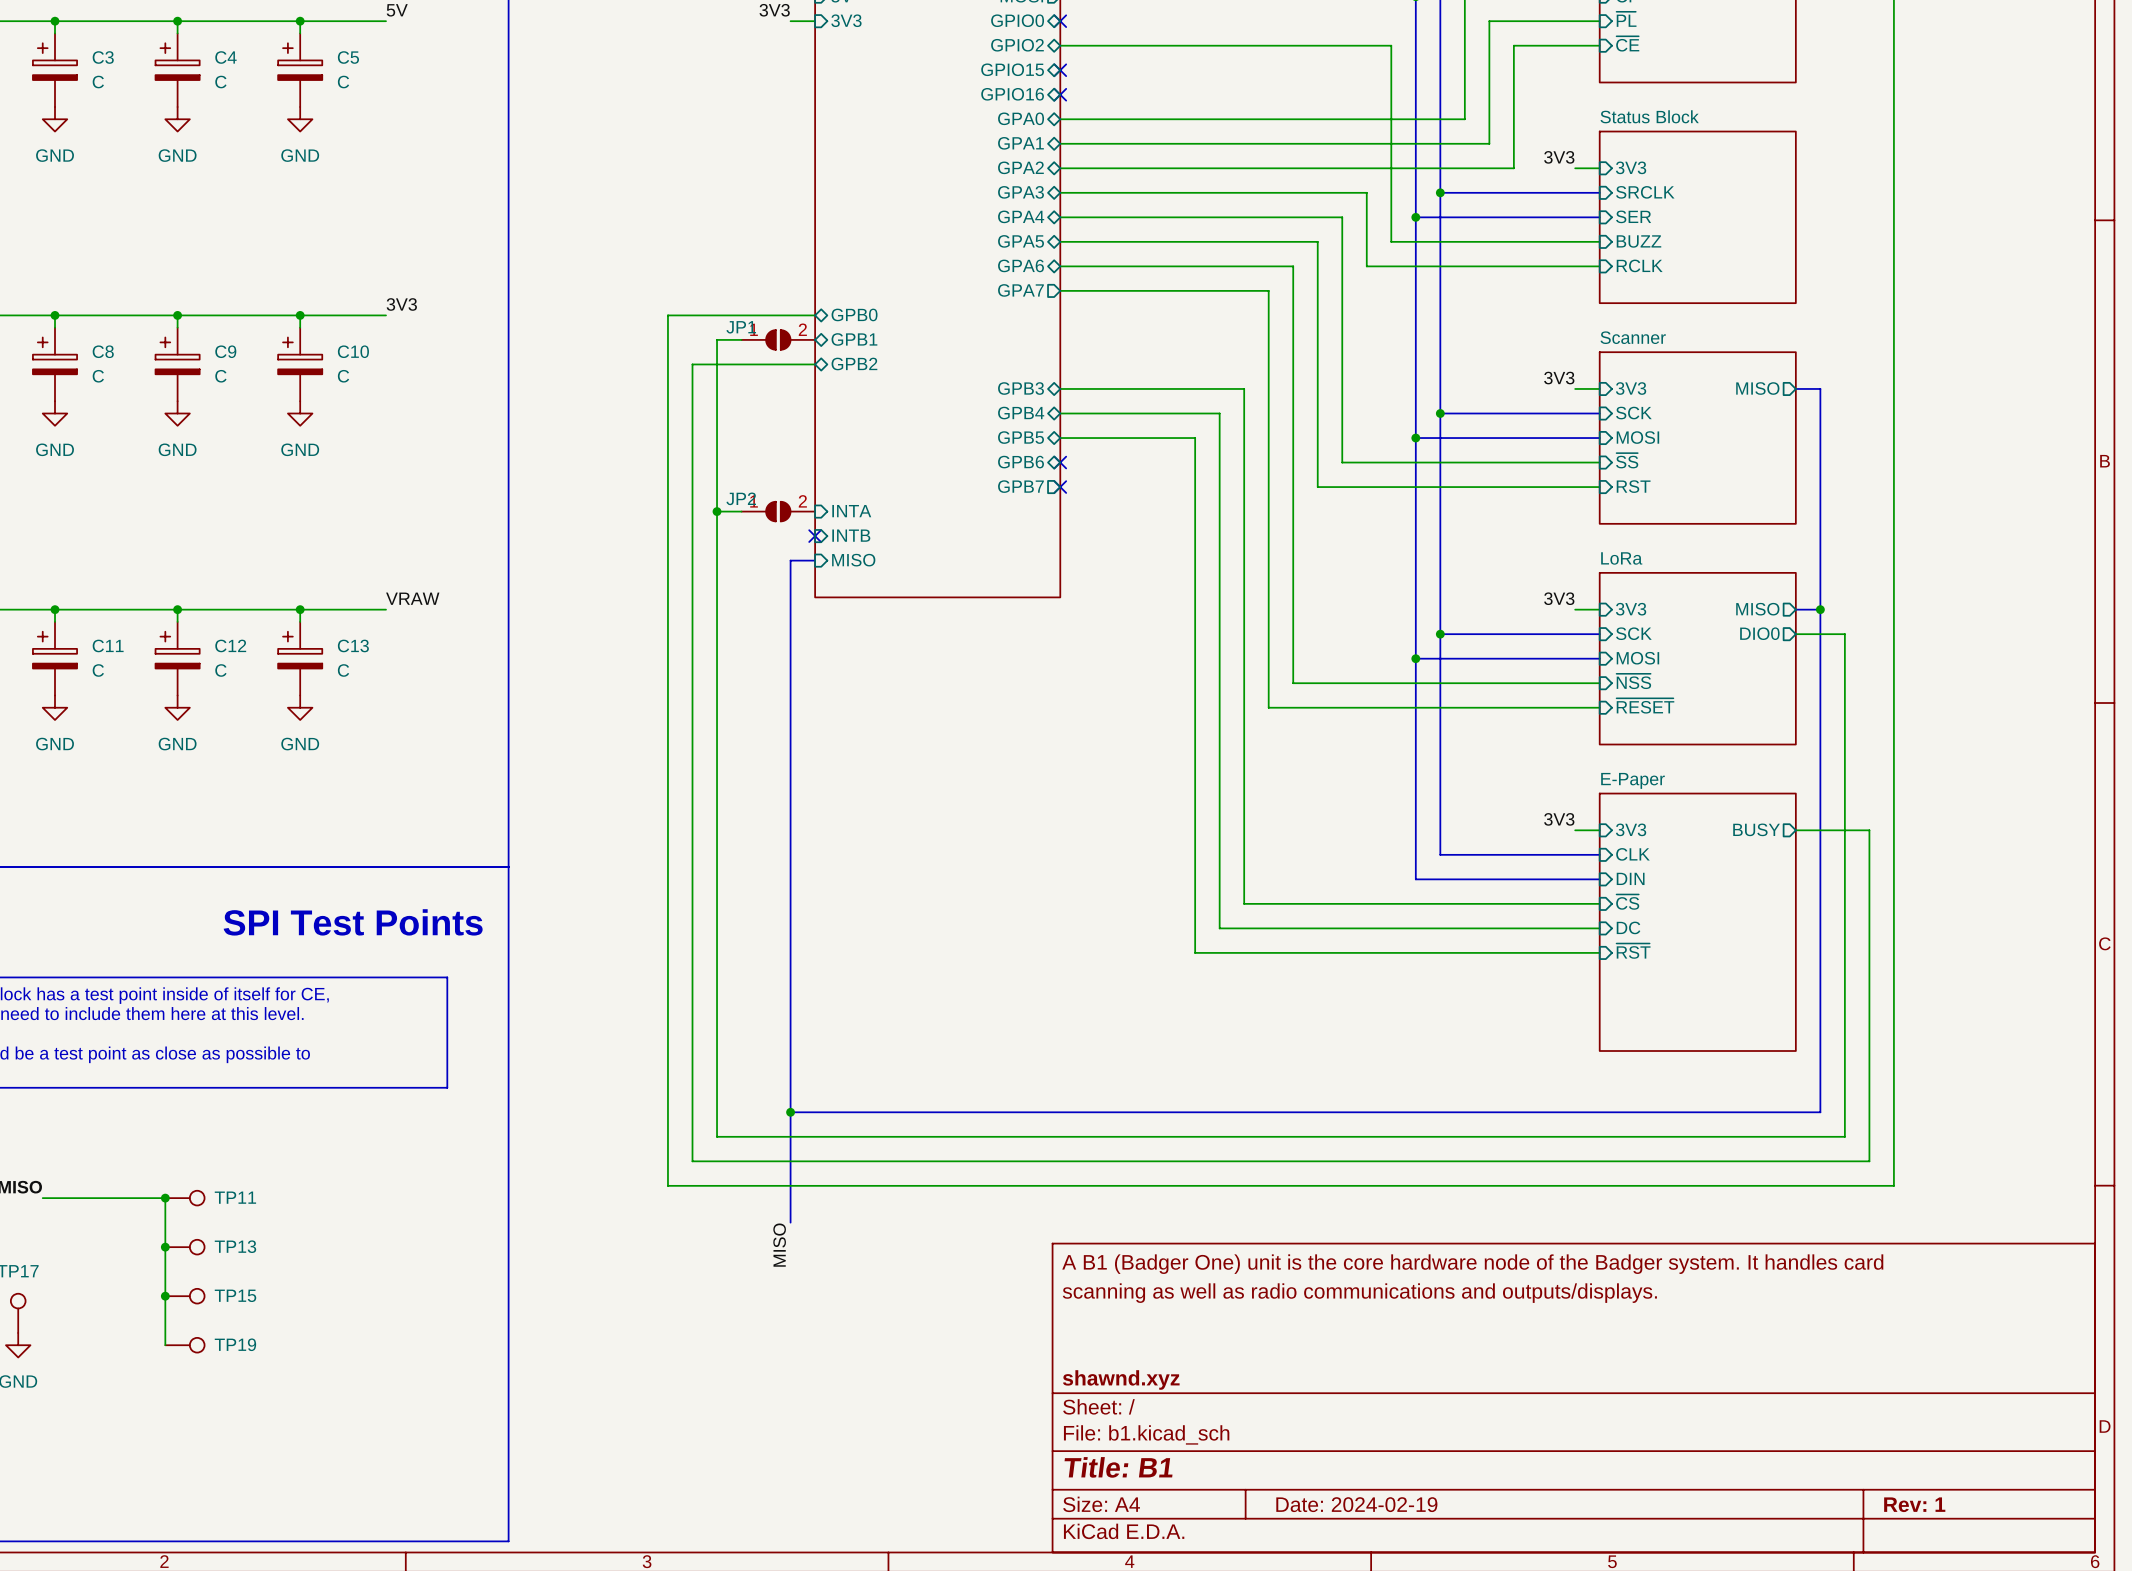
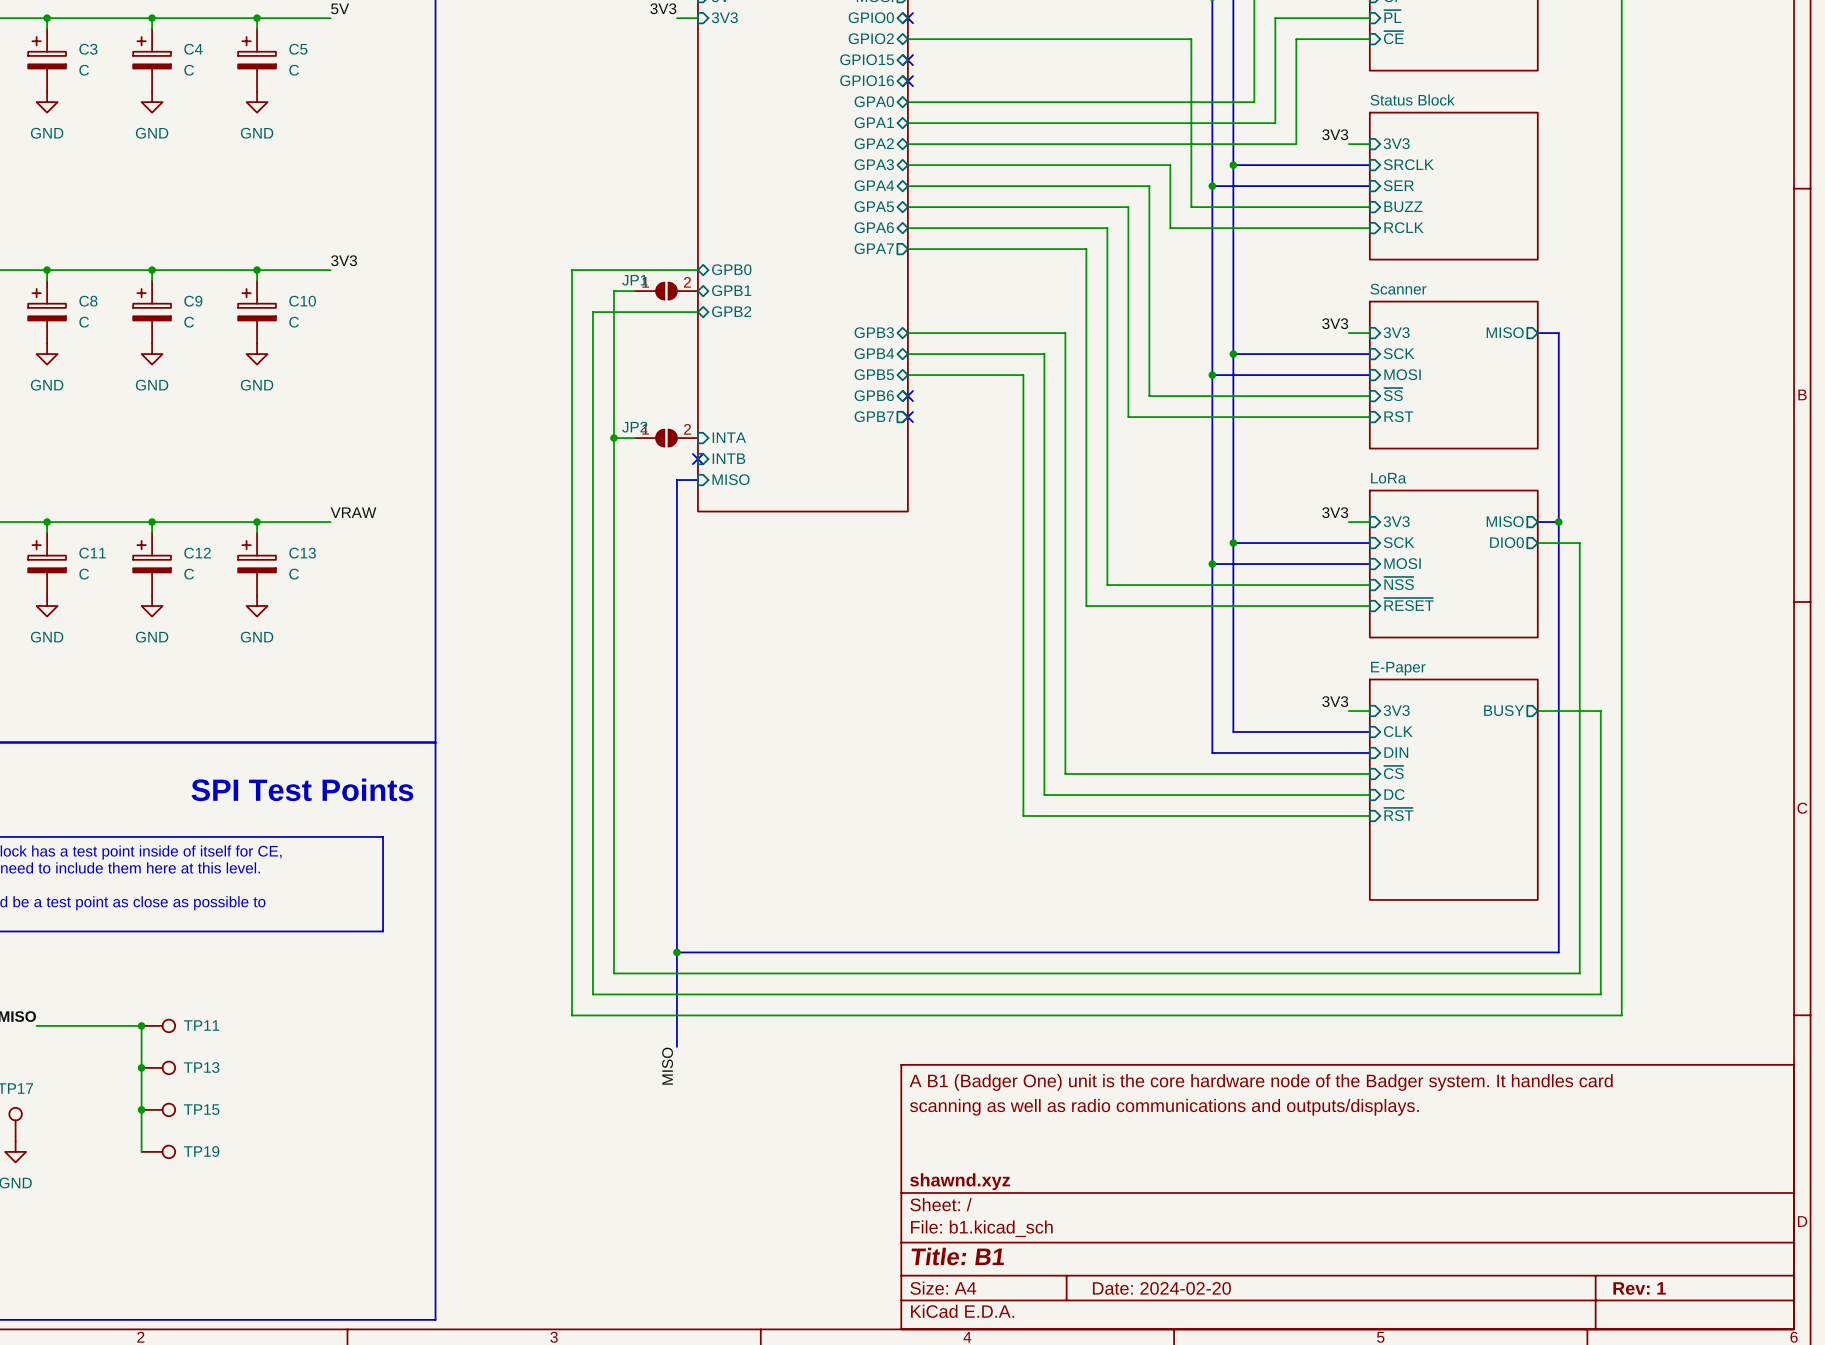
title block: Date: 2024-02-19 (1356, 1504) -> Date: 2024-02-20 (1161, 1288)

